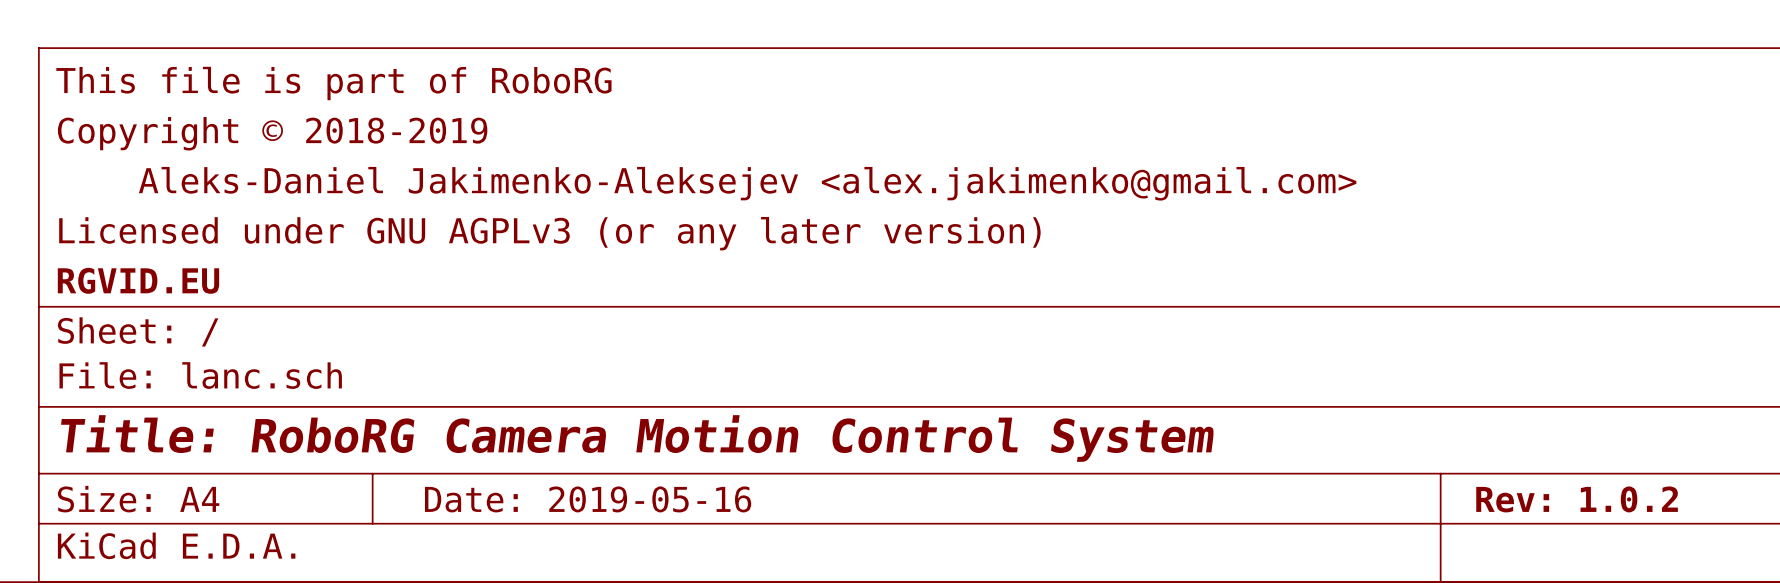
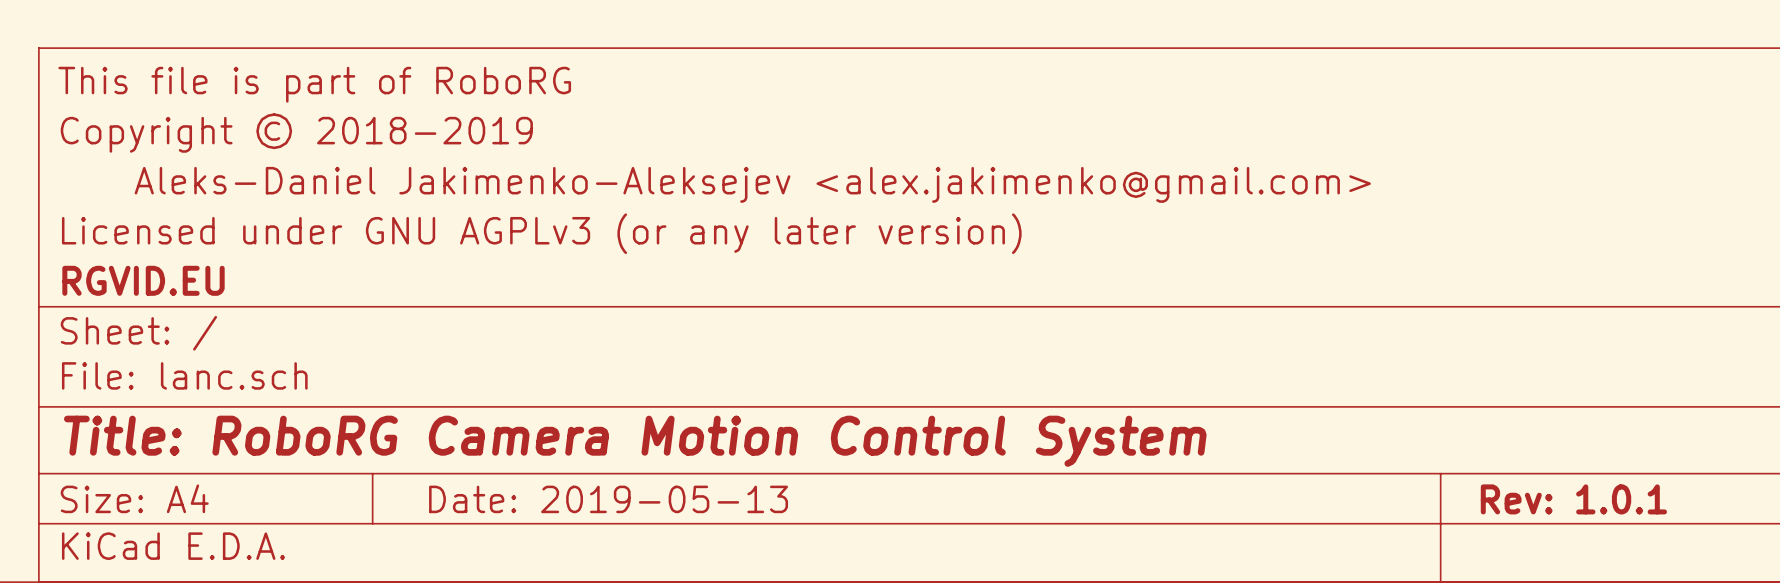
title block: Date: 2019-05-16 (588, 499) -> Date: 2019-05-13 (608, 499)
title block: Rev: 1.0.2 (1577, 499) -> Rev: 1.0.1 (1573, 499)

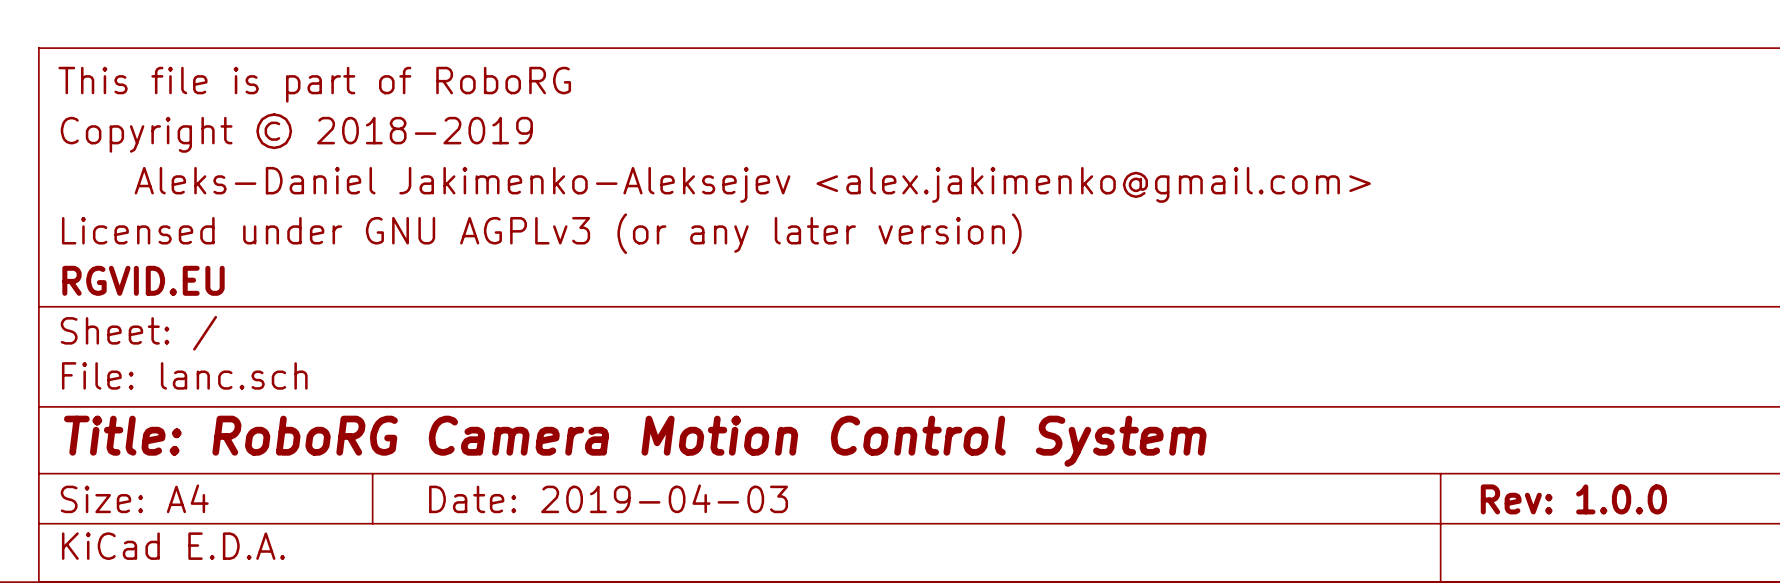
title block: Date: 2019-05-13 (608, 499) -> Date: 2019-04-03 (608, 498)
title block: Rev: 1.0.1 (1573, 499) -> Rev: 1.0.0 (1573, 499)

